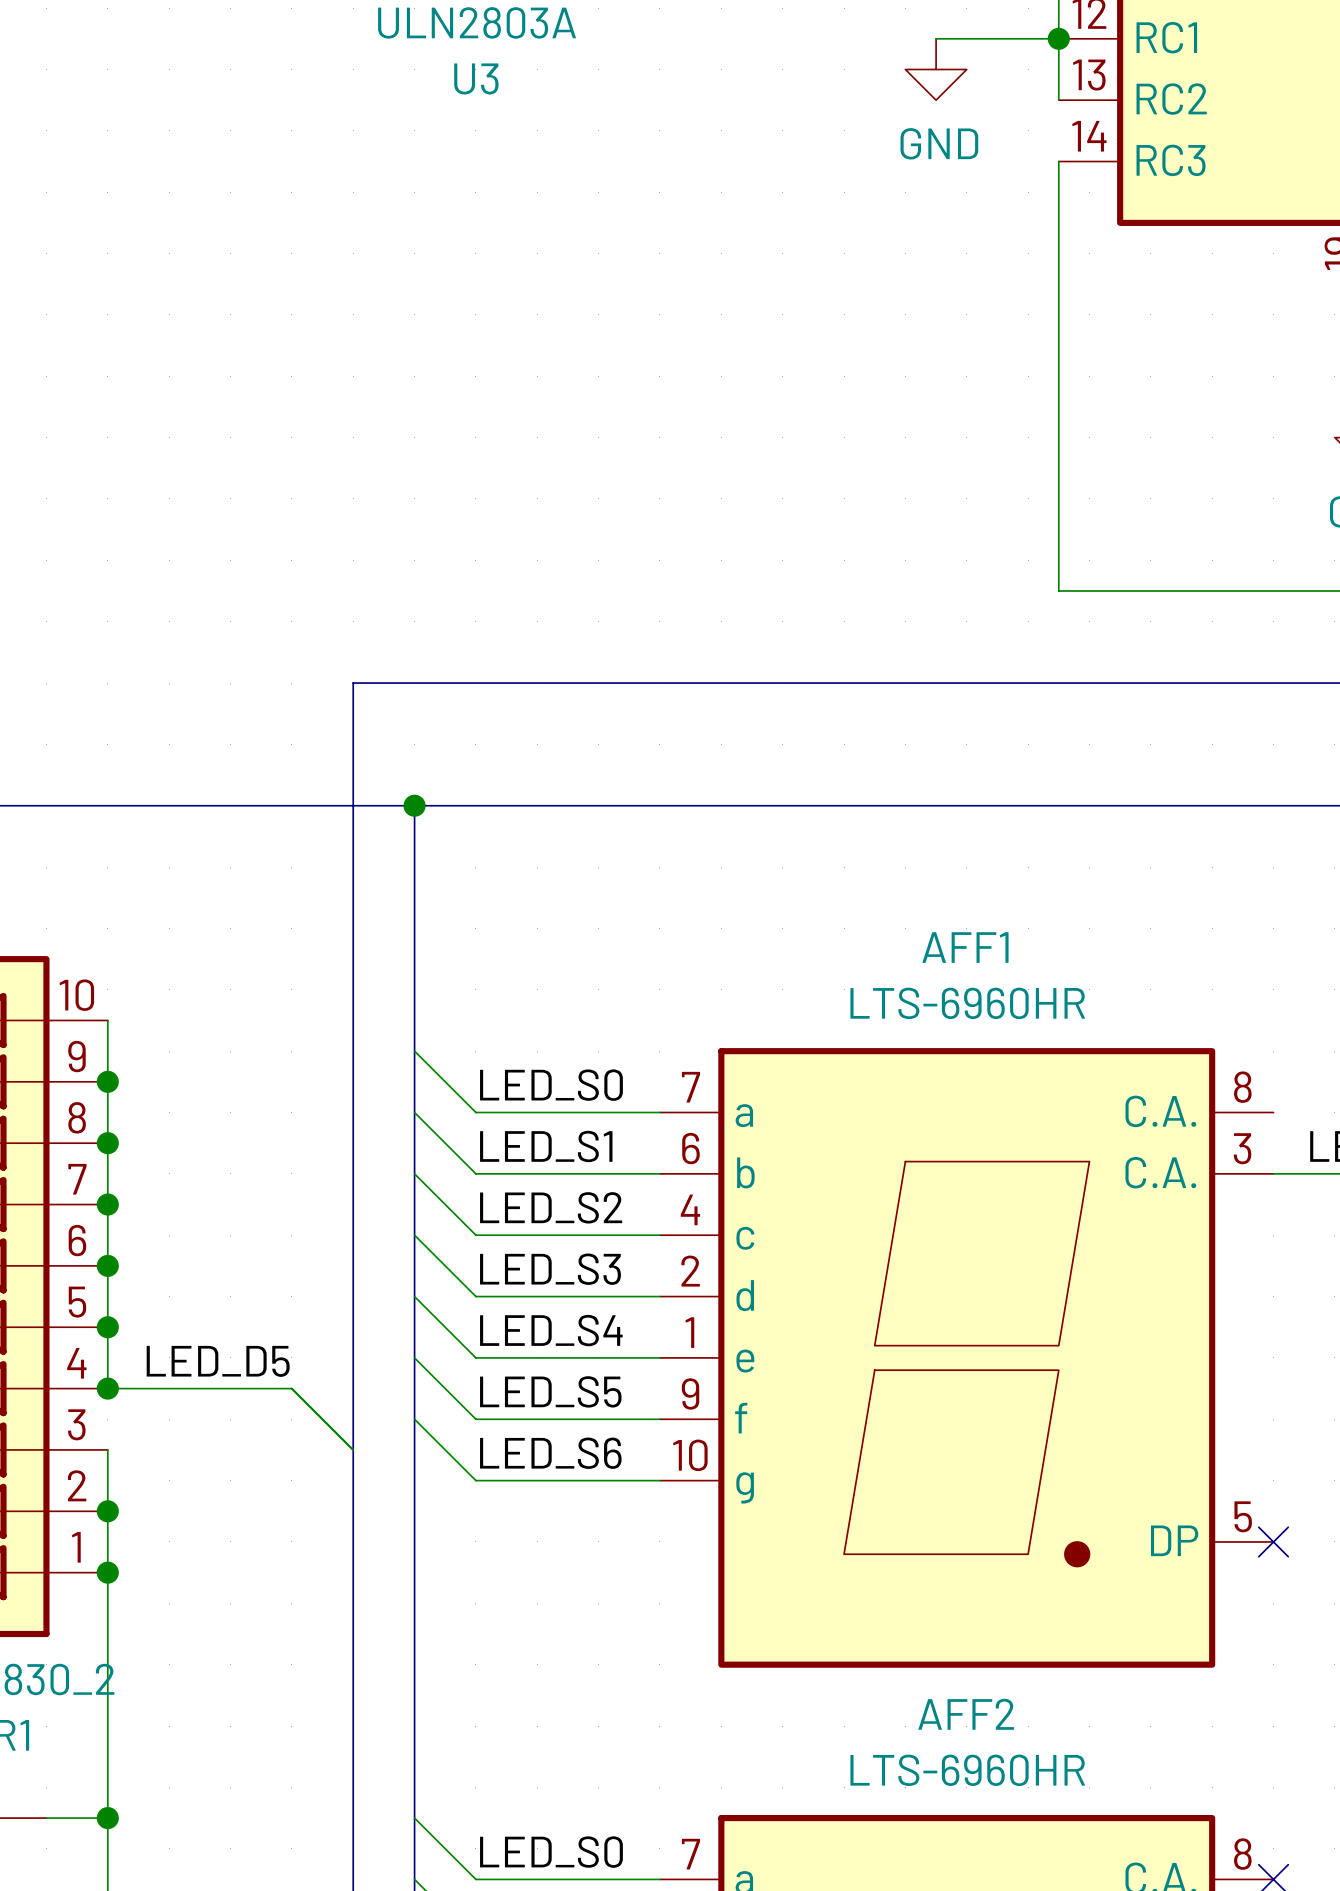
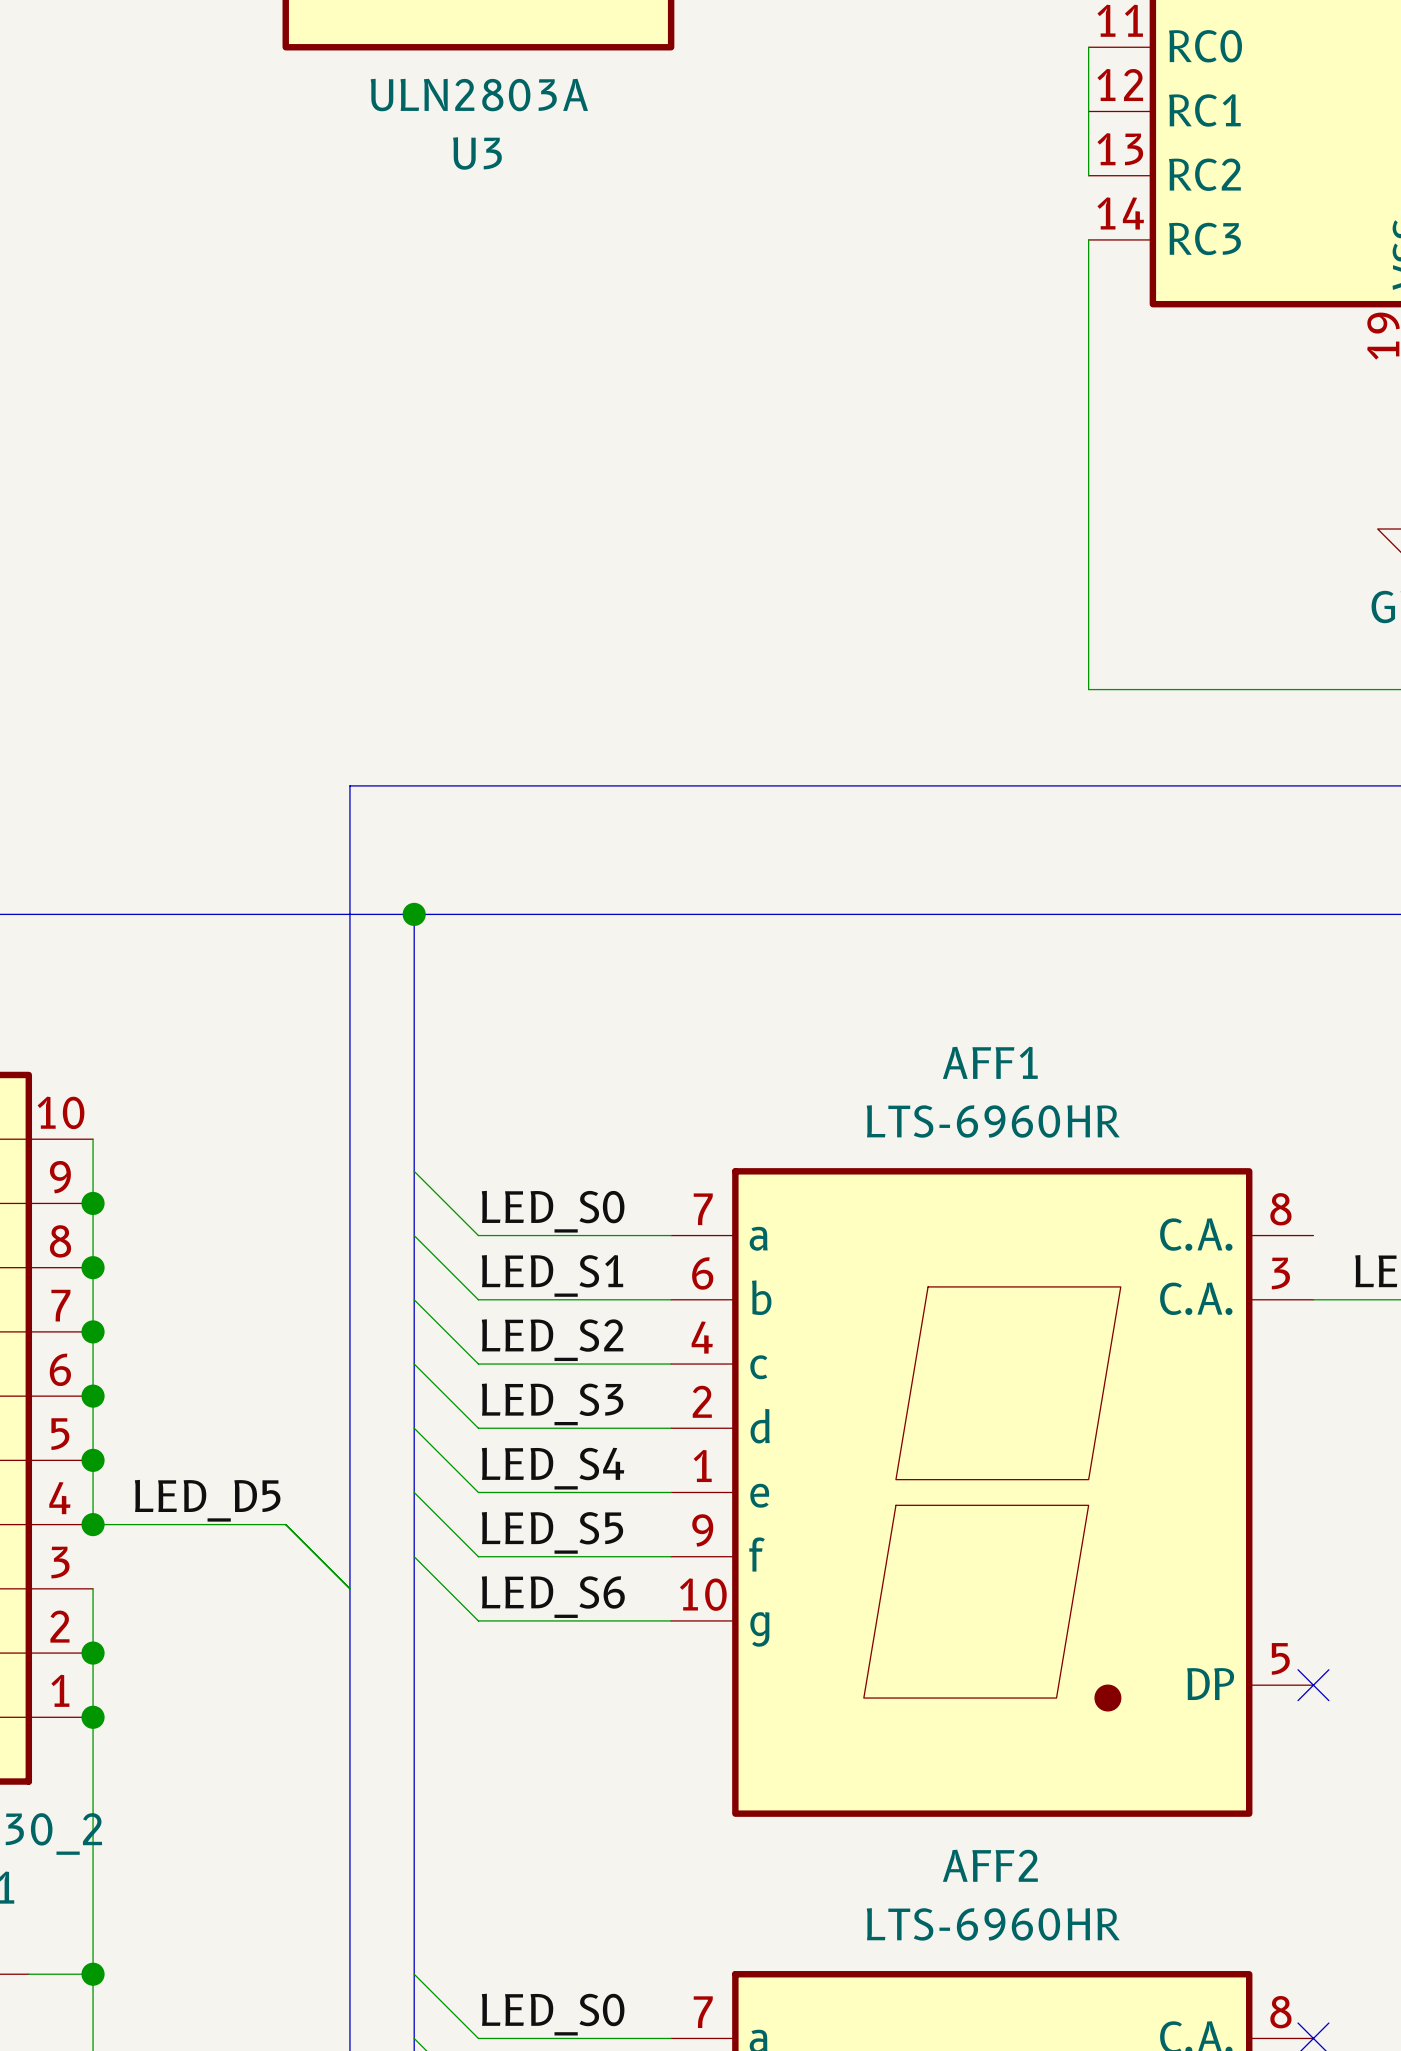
wire: (936, 38) (1058, 38) -> none
junction: (1058, 38) -> none
power symbol: GND (936, 69) -> none

